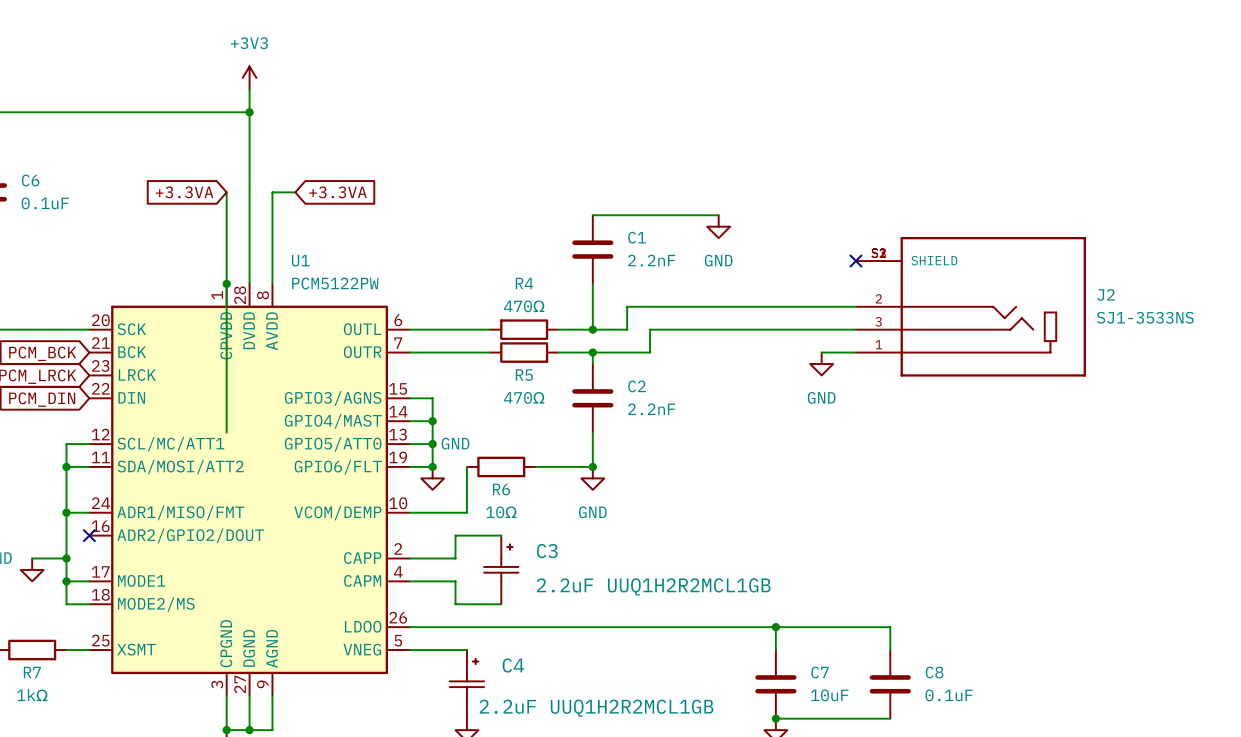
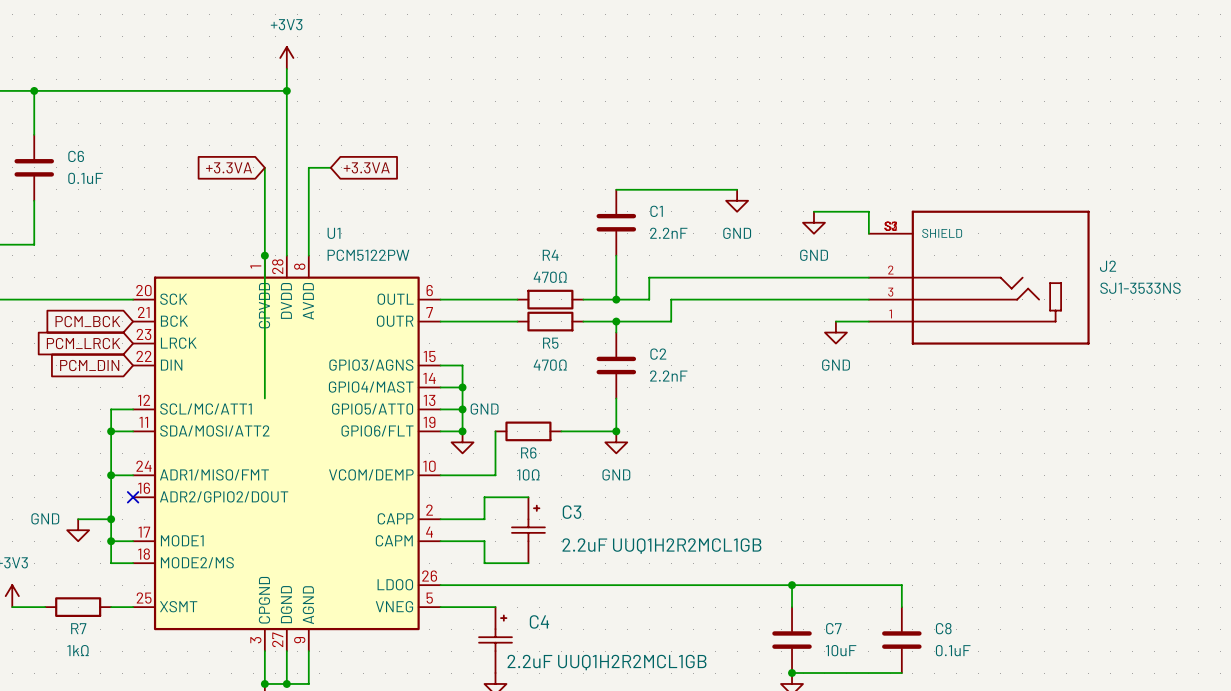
wire: none -> (813, 211) (868, 211) (868, 233)
power symbol: none -> GND (813, 222)
no-connect mark: (855, 261) -> none

